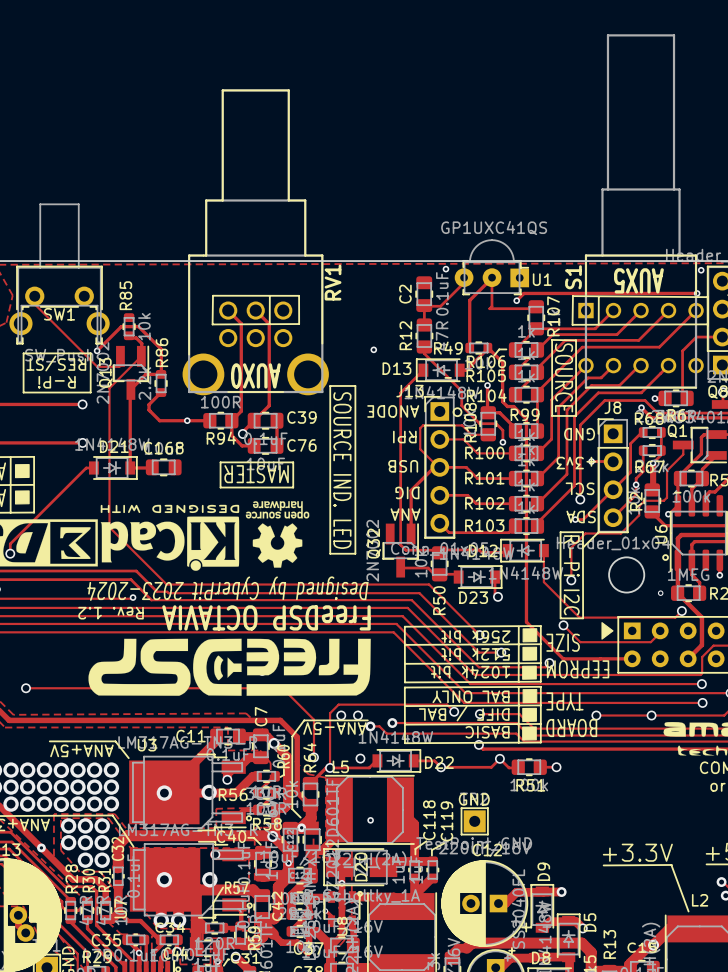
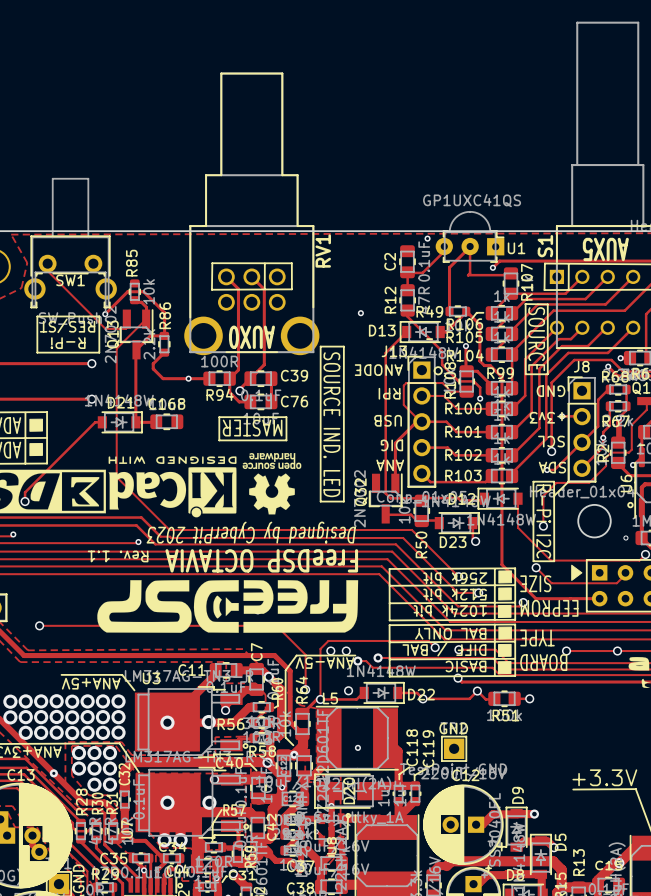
text: Designed by CyberPit 2023-2024 (227, 588) -> Designed by CyberPit 2023 (251, 532)
text: Rev. 1.2 (111, 613) -> Rev. 1.1 (118, 556)

